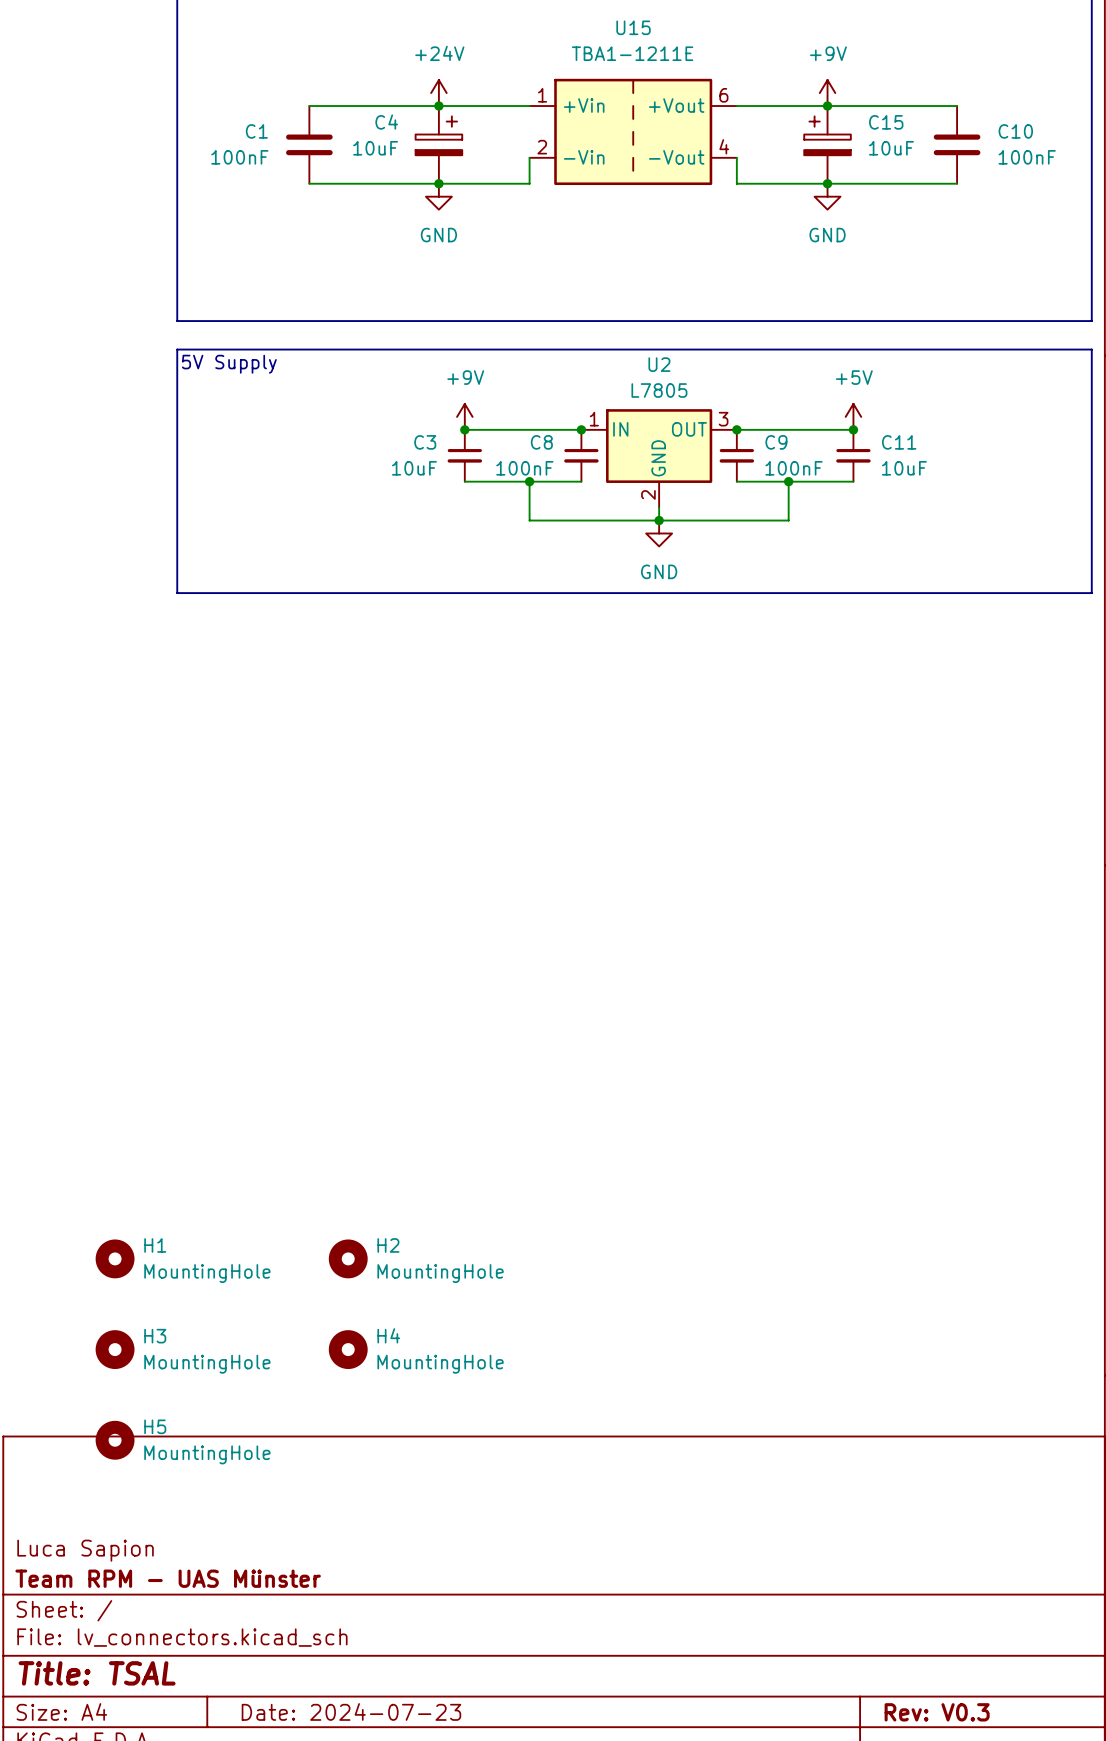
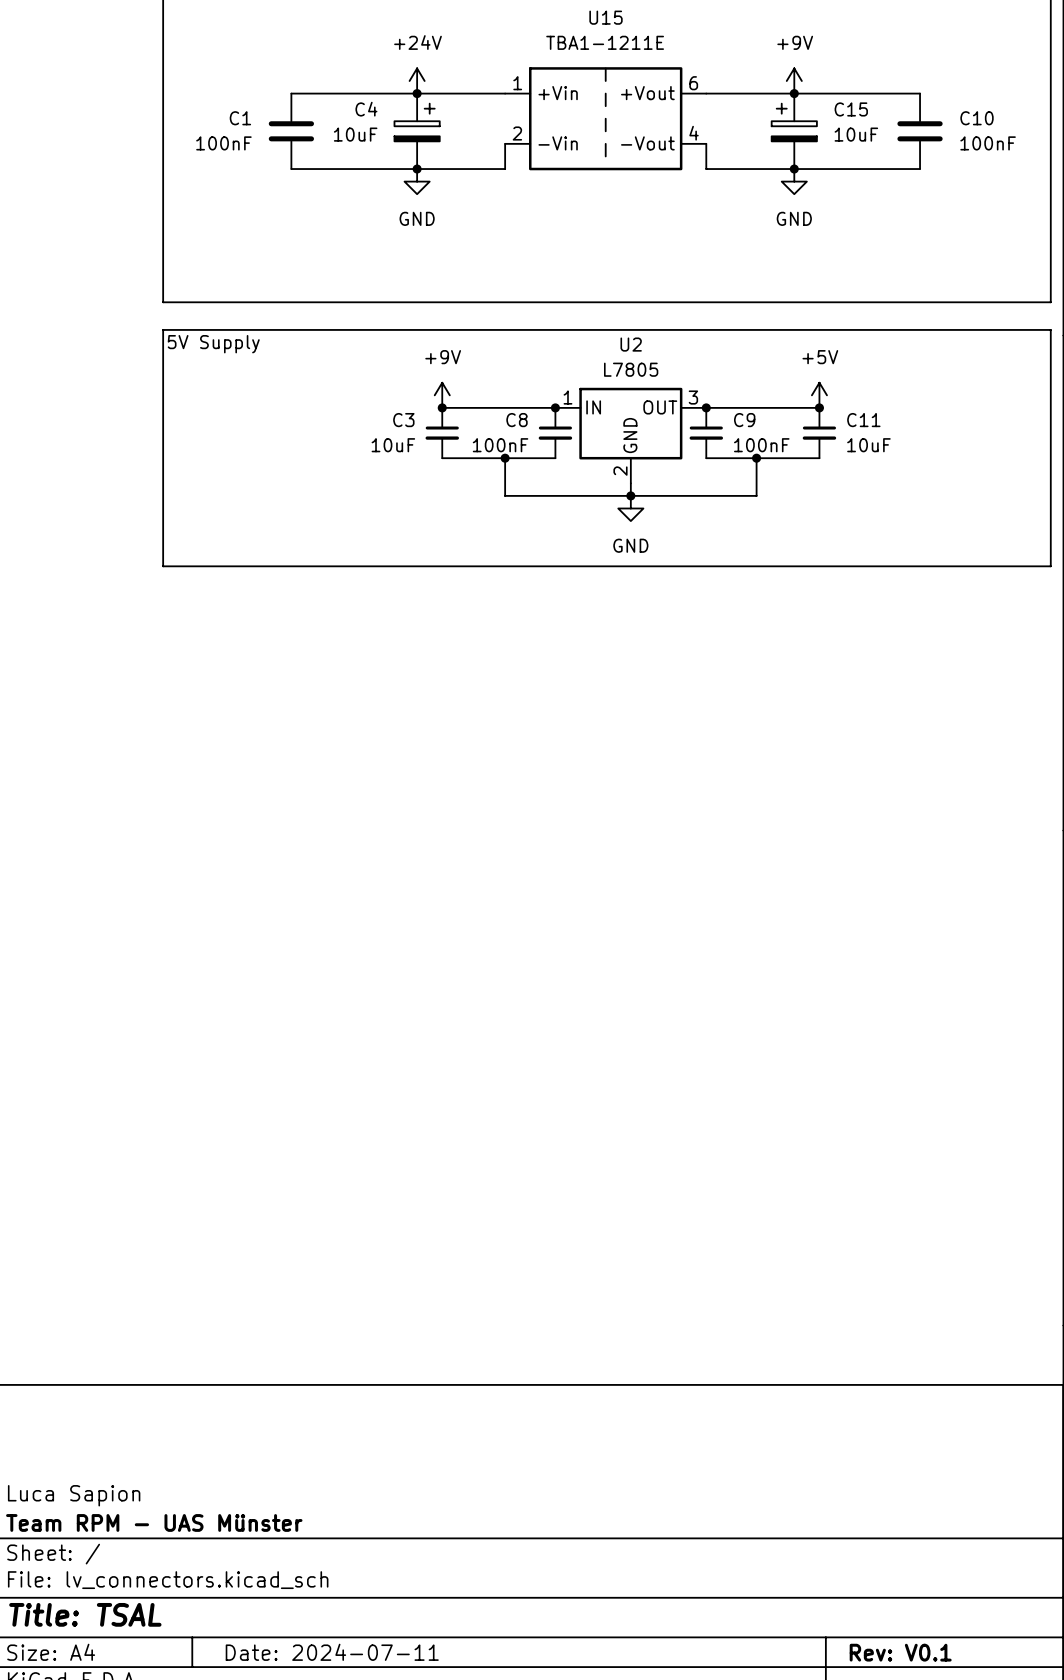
H1: MountingHole (115, 1258) -> none
H2: MountingHole (348, 1258) -> none
H3: MountingHole (115, 1349) -> none
H4: MountingHole (348, 1349) -> none
H5: MountingHole (115, 1440) -> none
title block: Date: 2024-07-23 (351, 1711) -> Date: 2024-07-11 (332, 1652)
title block: Rev: V0.3 (937, 1712) -> Rev: V0.1 (900, 1652)

